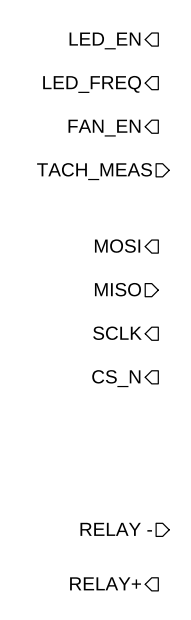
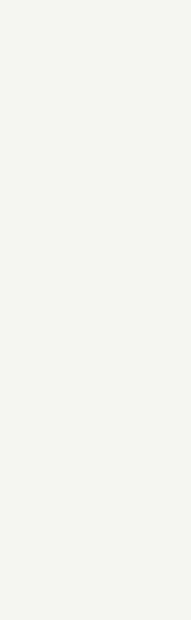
hierarchical label: LED_EN (104, 40) -> none
hierarchical label: LED_FREQ (92, 84) -> none
hierarchical label: FAN_EN (104, 128) -> none
hierarchical label: TACH_MEAS (94, 171) -> none
hierarchical label: MOSI (117, 246) -> none
hierarchical label: MISO (117, 289) -> none
hierarchical label: SCLK (117, 333) -> none
hierarchical label: CS_N (116, 378) -> none
hierarchical label: RELAY - (116, 529) -> none
hierarchical label: RELAY+ (105, 583) -> none

